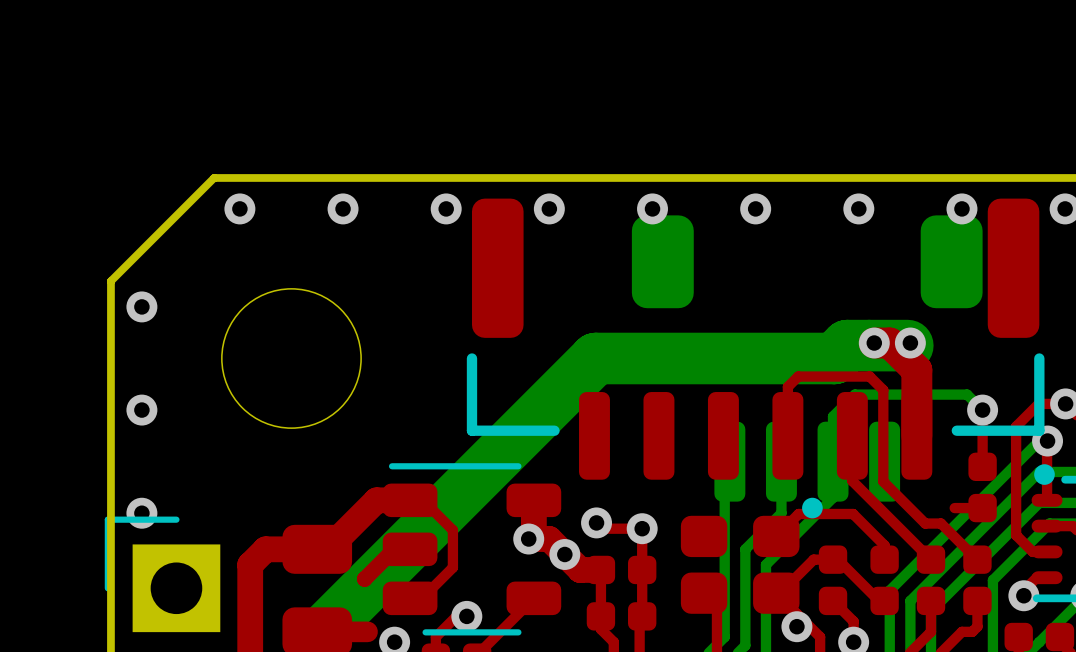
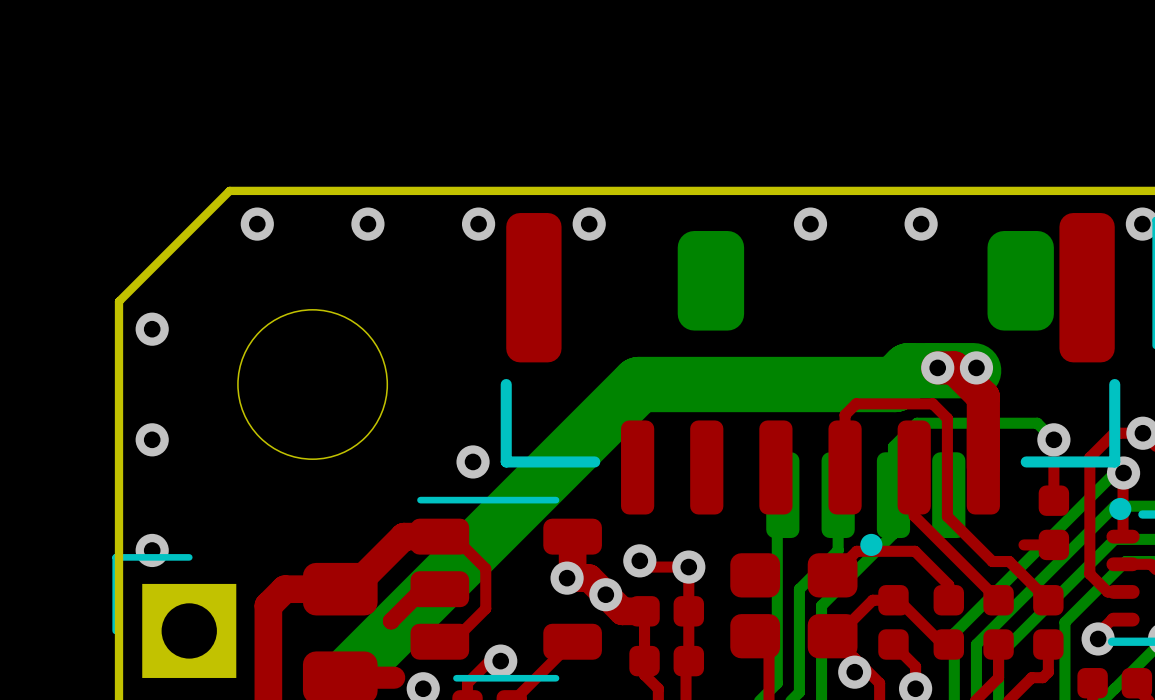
via: (652, 208) -> none
via: (961, 208) -> none
via: none -> (473, 461)

